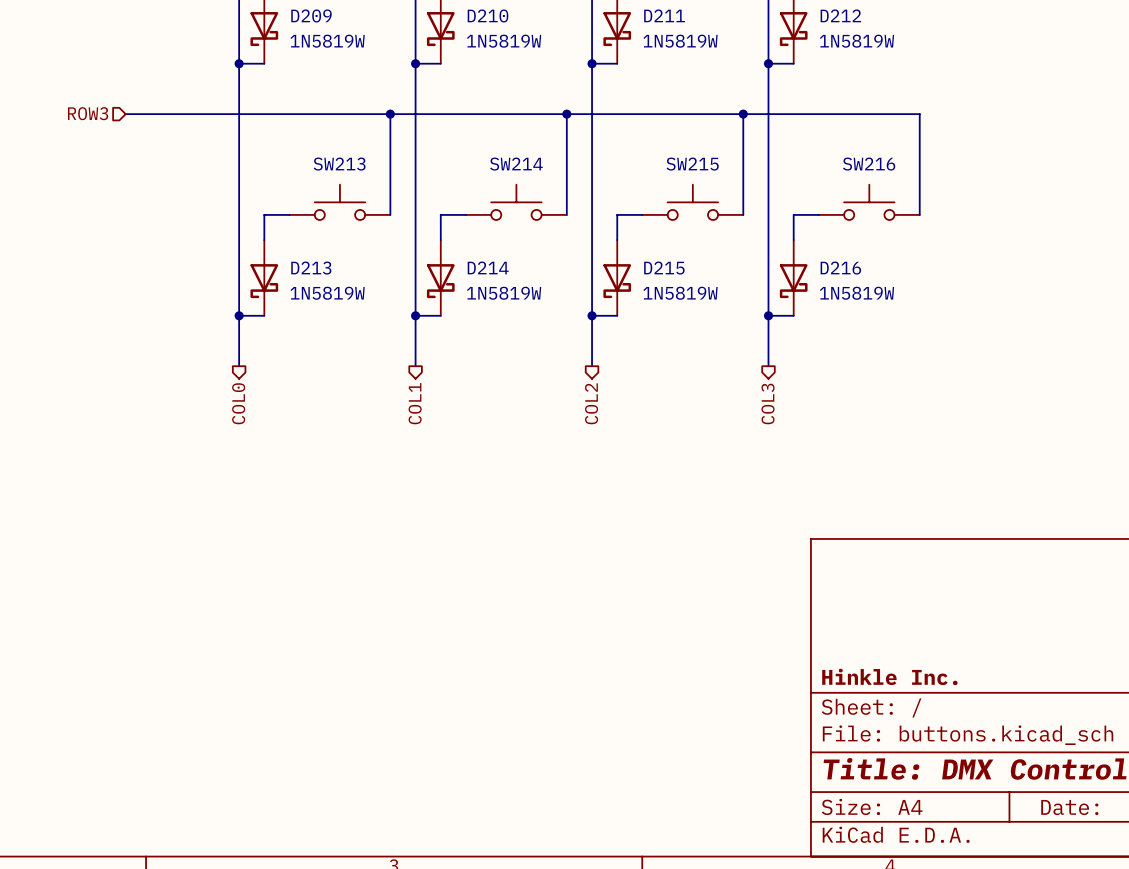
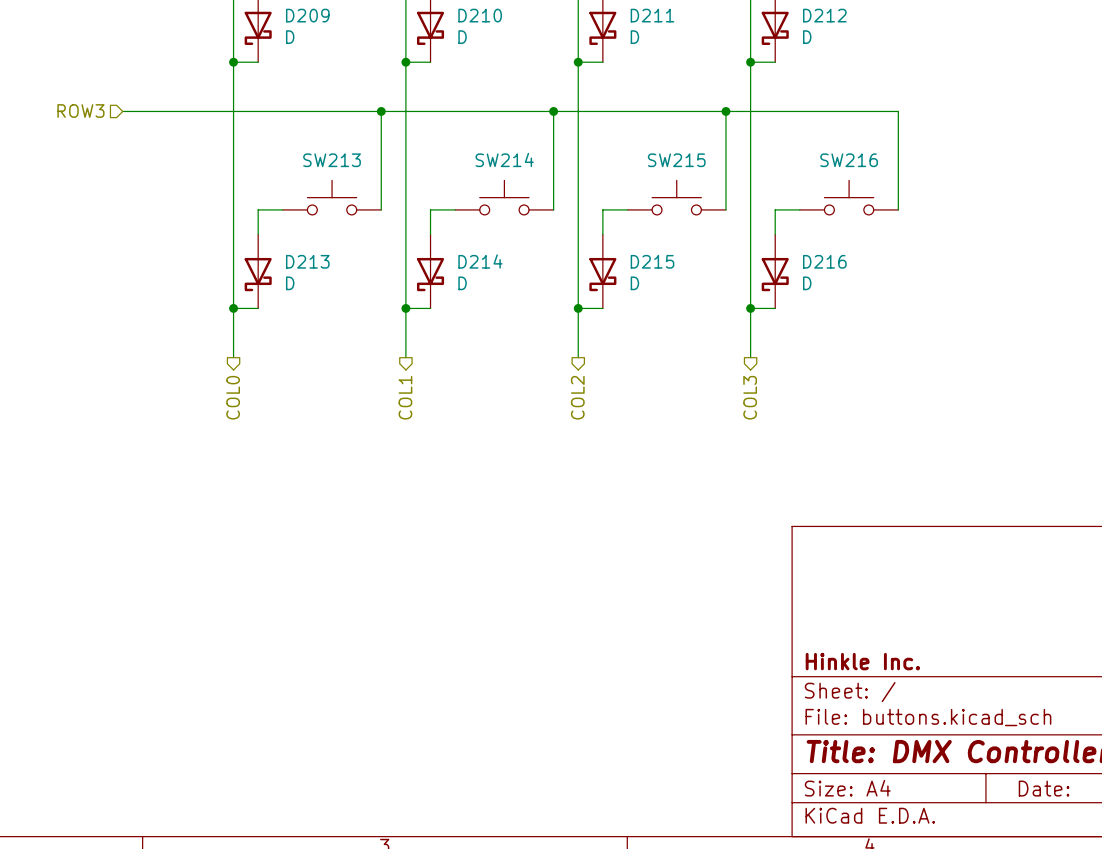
D209 value: 1N5819W (327, 41) -> D (290, 37)
D210 value: 1N5819W (504, 41) -> D (462, 37)
D211 value: 1N5819W (680, 41) -> D (634, 37)
D212 value: 1N5819W (856, 41) -> D (807, 37)
D213 value: 1N5819W (327, 293) -> D (290, 283)
D214 value: 1N5819W (504, 293) -> D (462, 283)
D215 value: 1N5819W (680, 293) -> D (634, 283)
D216 value: 1N5819W (856, 293) -> D (807, 283)

